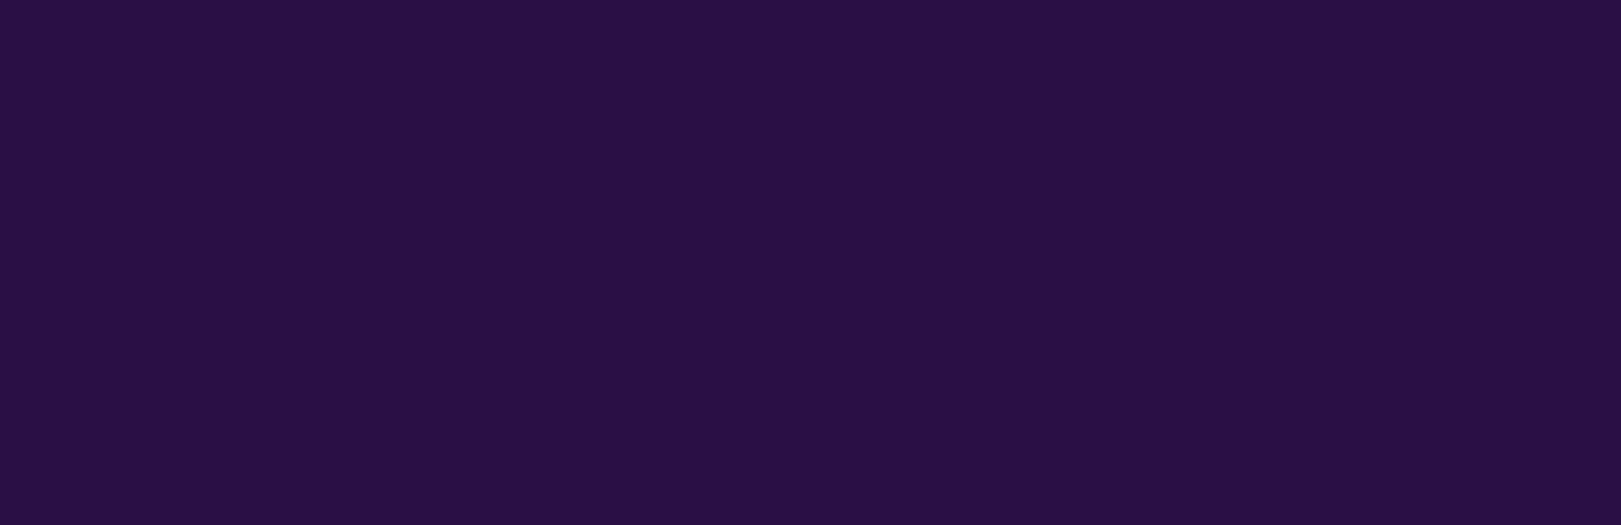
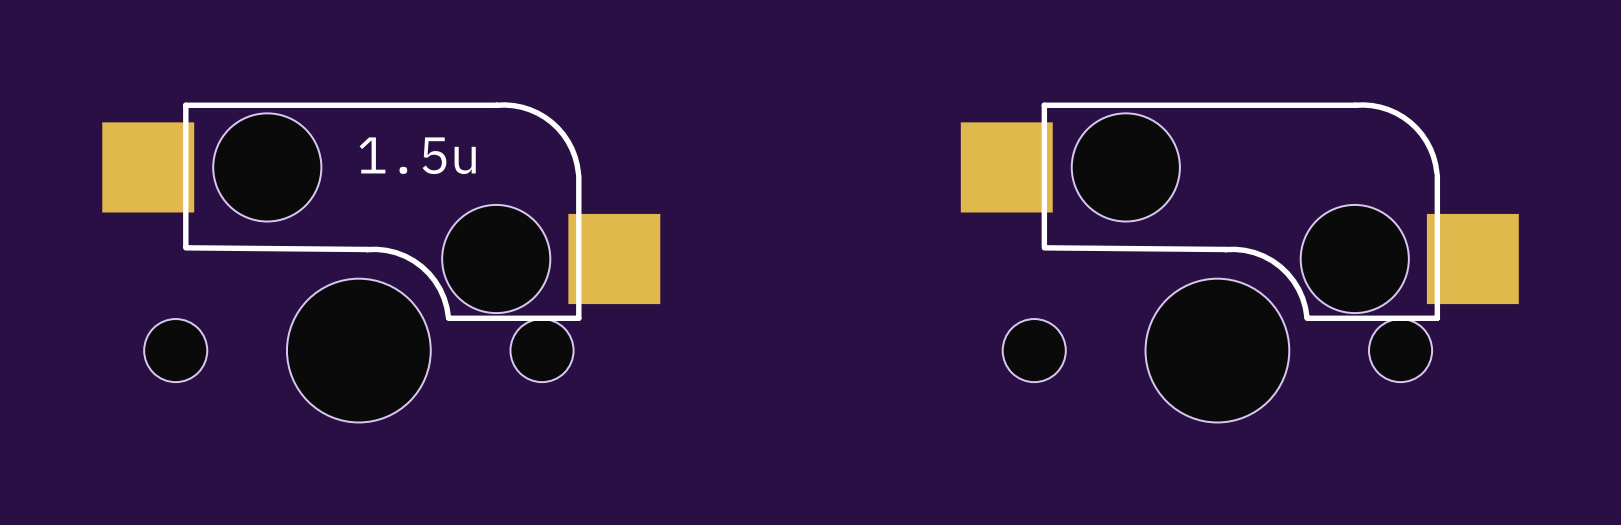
part: none -> (381, 262)
part: none -> (1239, 262)

